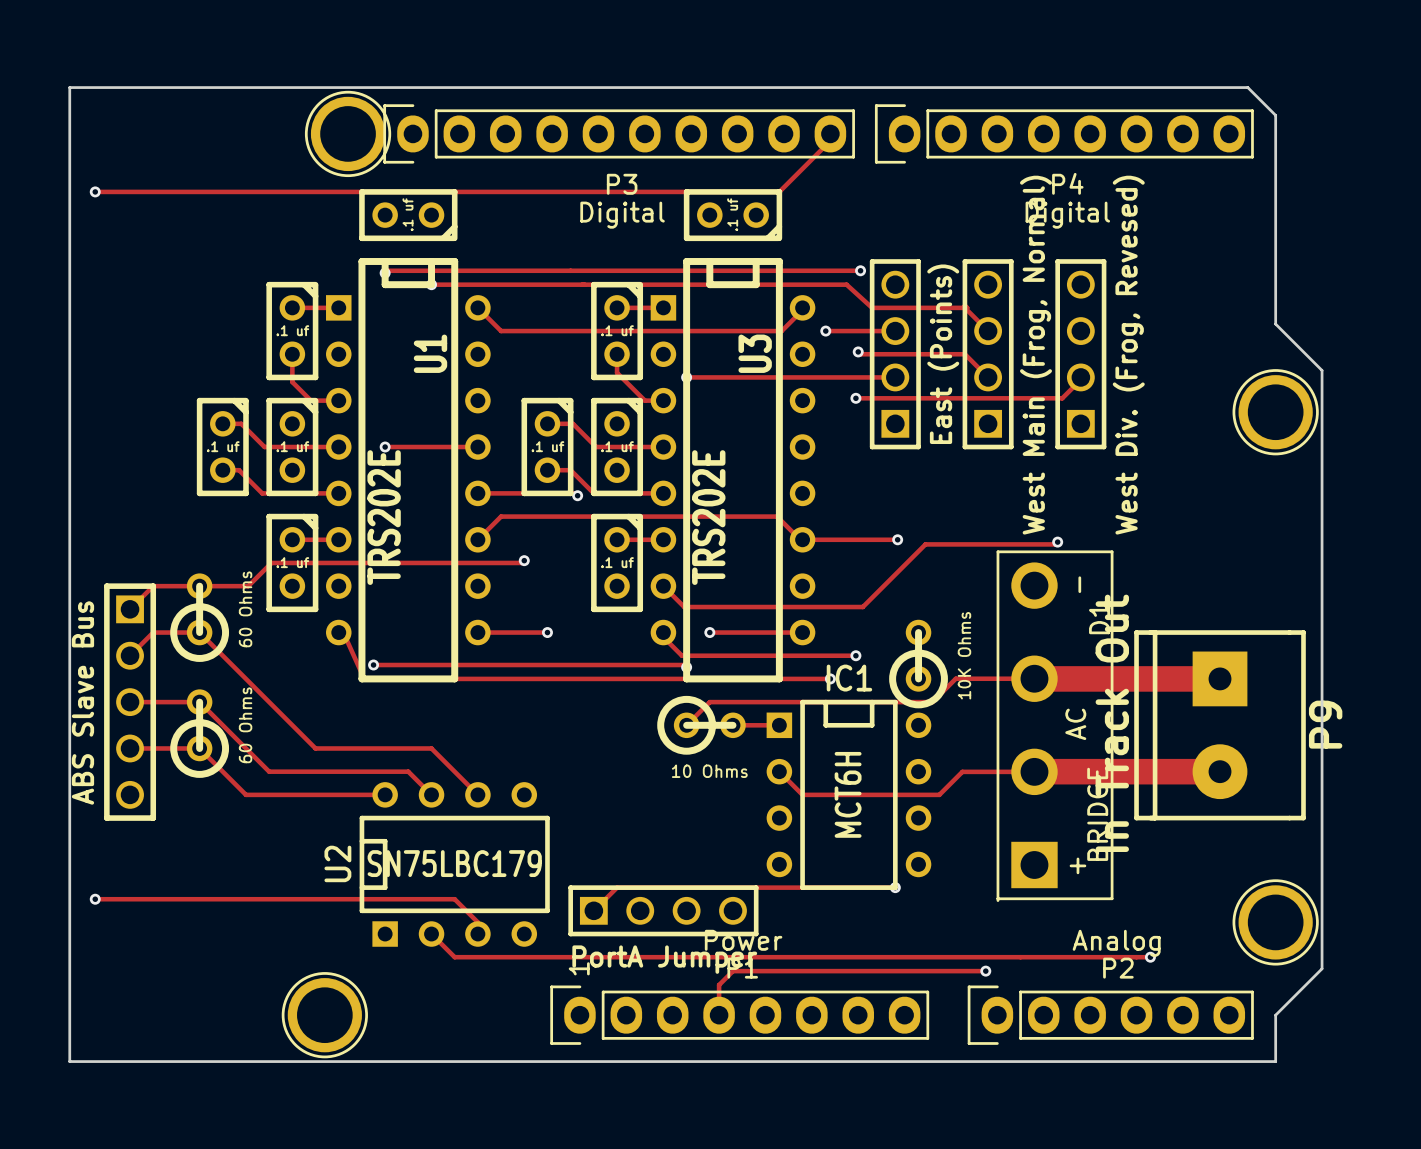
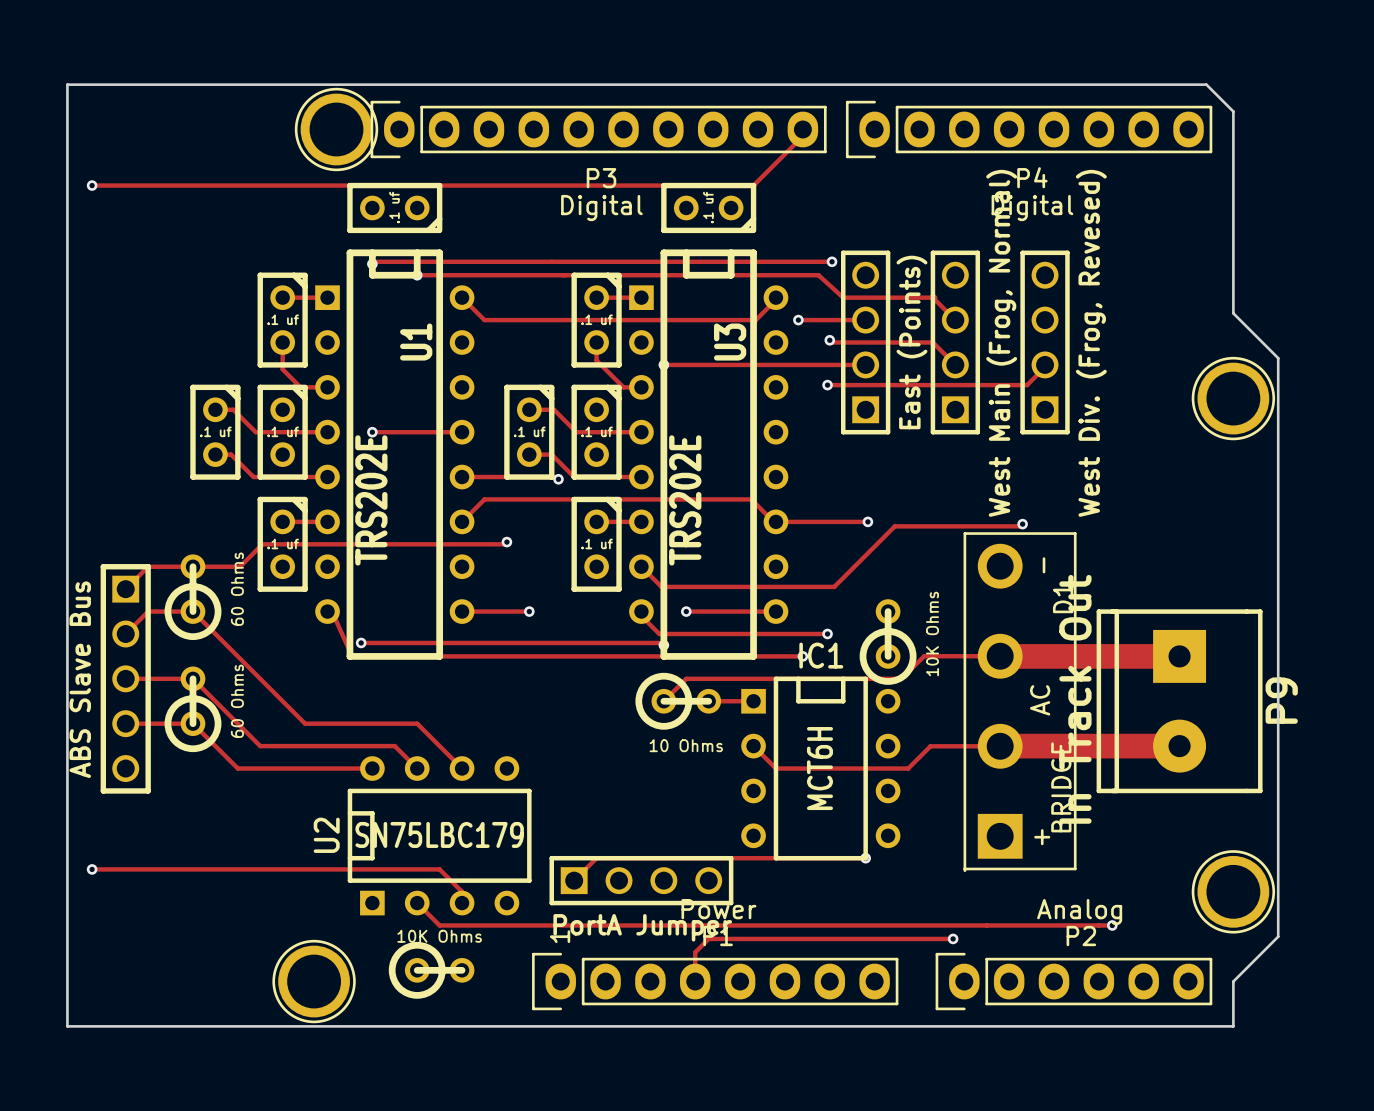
part: none -> 10K Ohms (431, 970)

